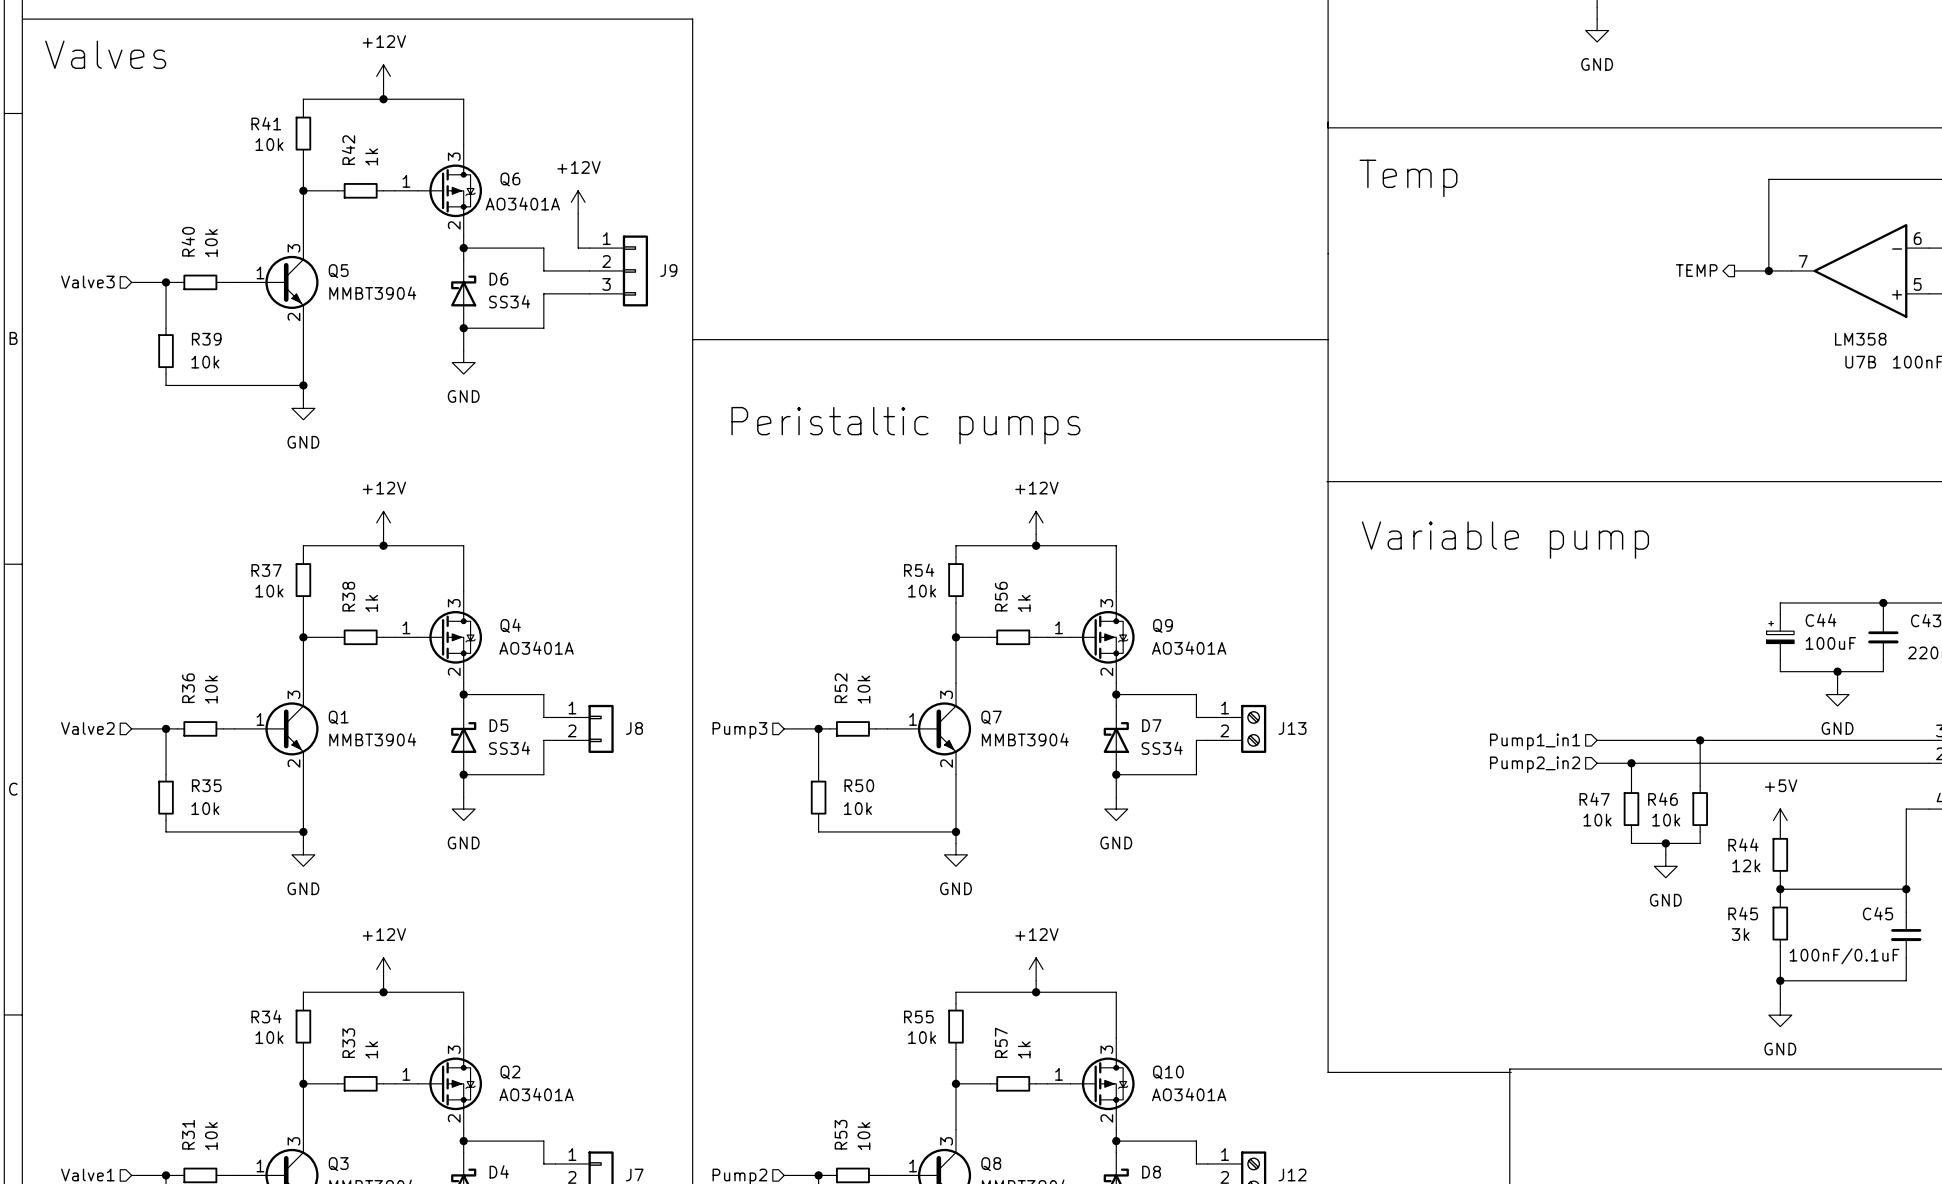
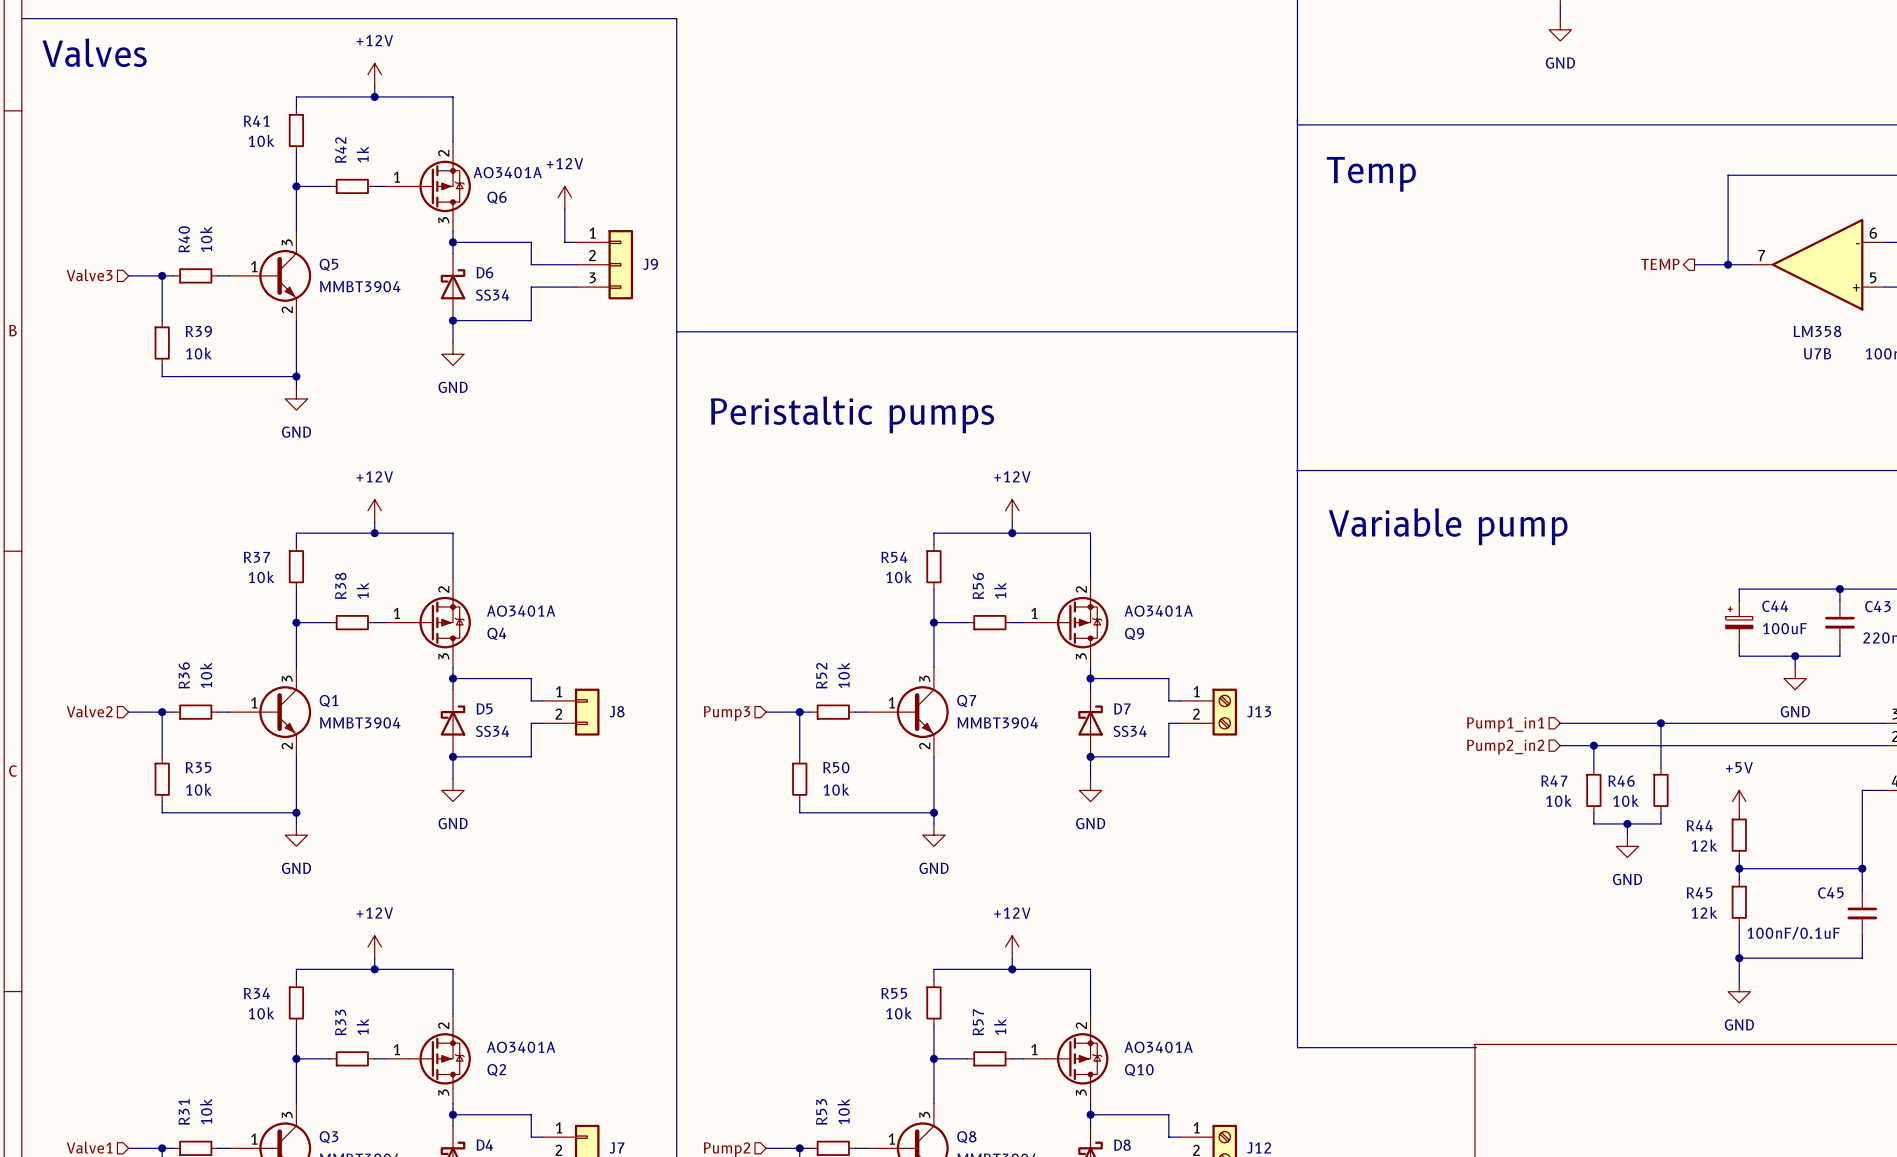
Q6 flip: as is (449, 190) -> up-down (439, 186)
Q4 flip: as is (449, 637) -> up-down (439, 622)
Q9 flip: as is (1102, 637) -> up-down (1077, 622)
R45 value: 3k (1740, 934) -> 12k (1704, 912)
Q2 flip: as is (449, 1083) -> up-down (439, 1058)
Q10 flip: as is (1102, 1083) -> up-down (1077, 1058)

